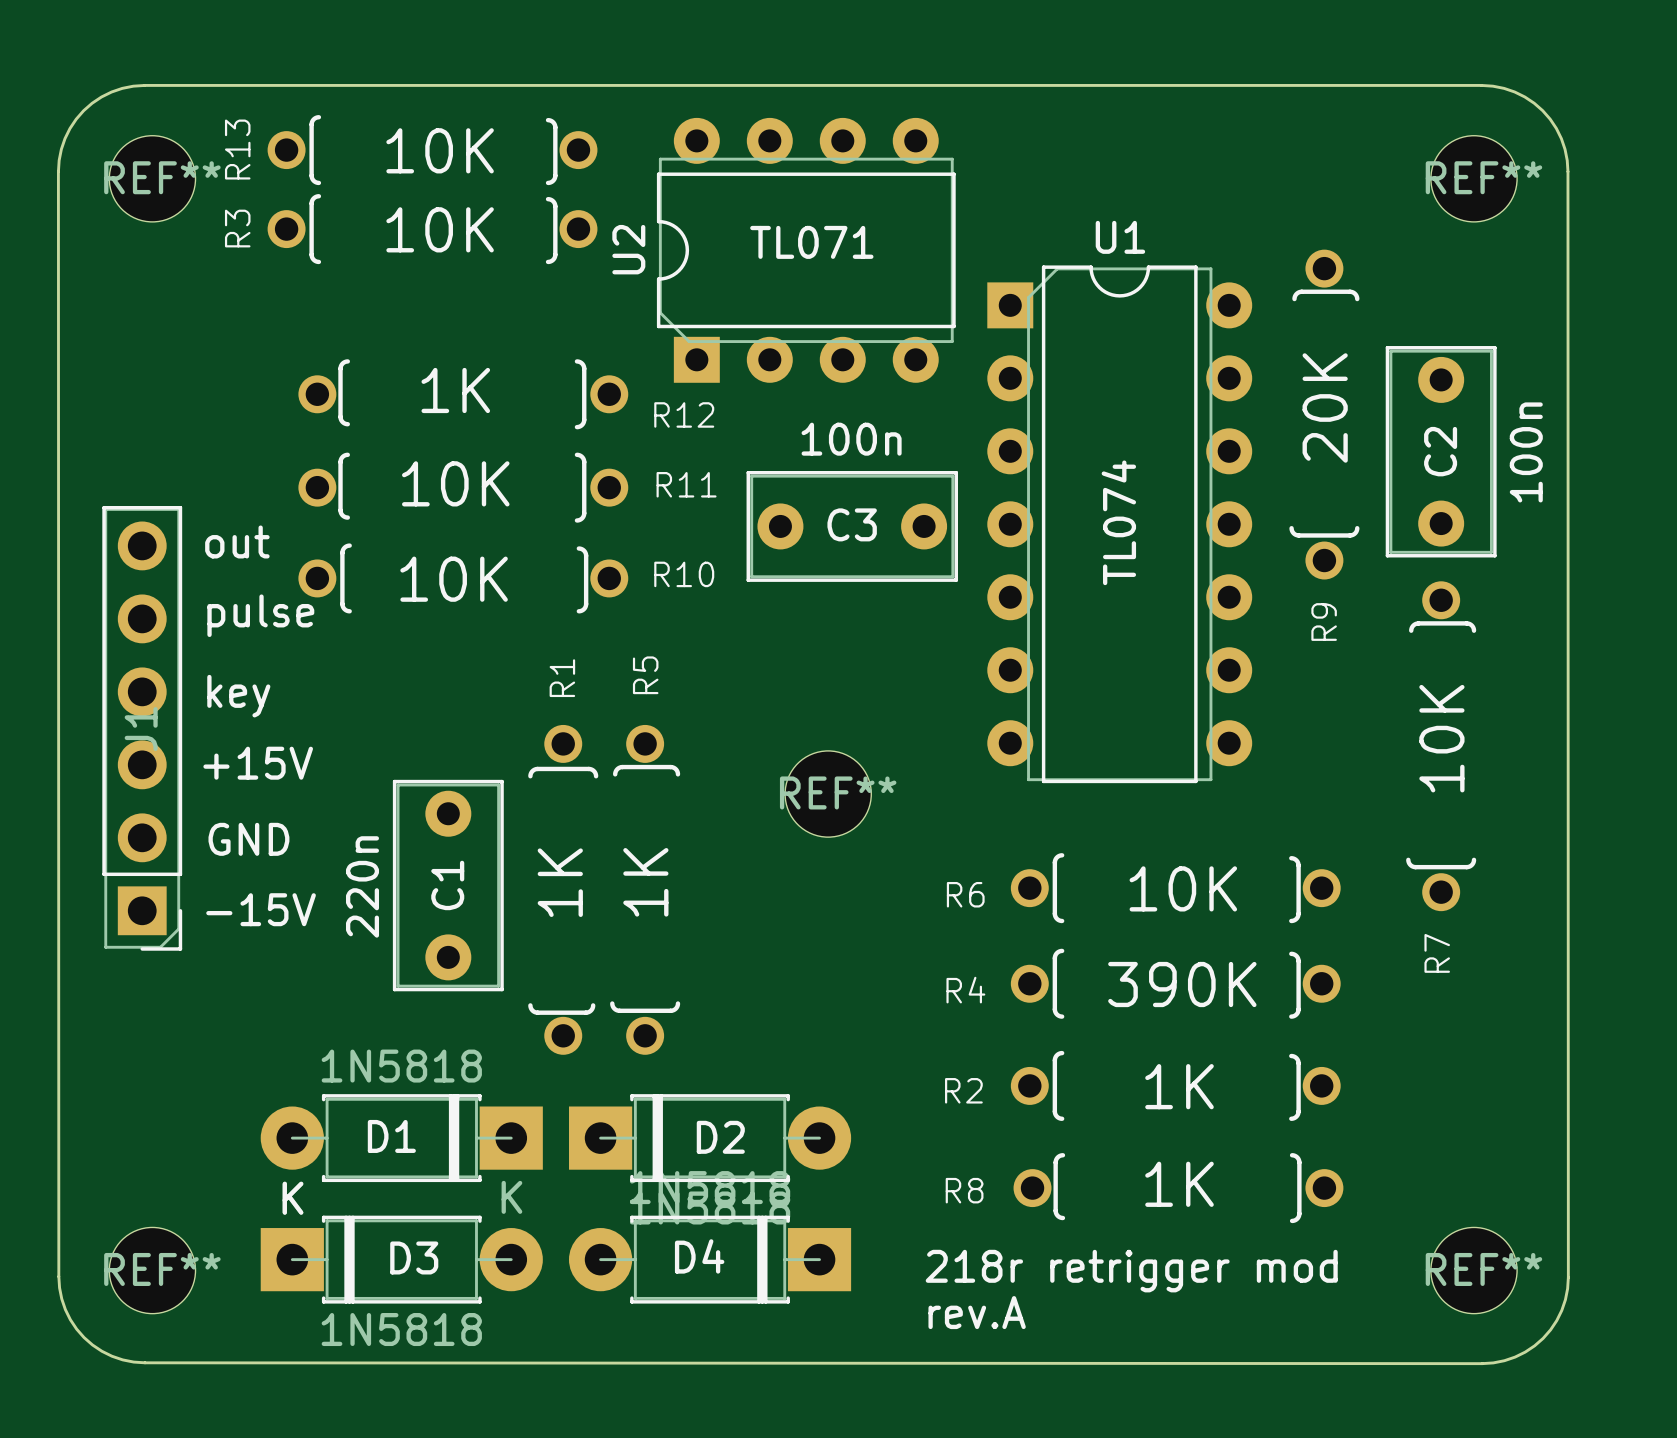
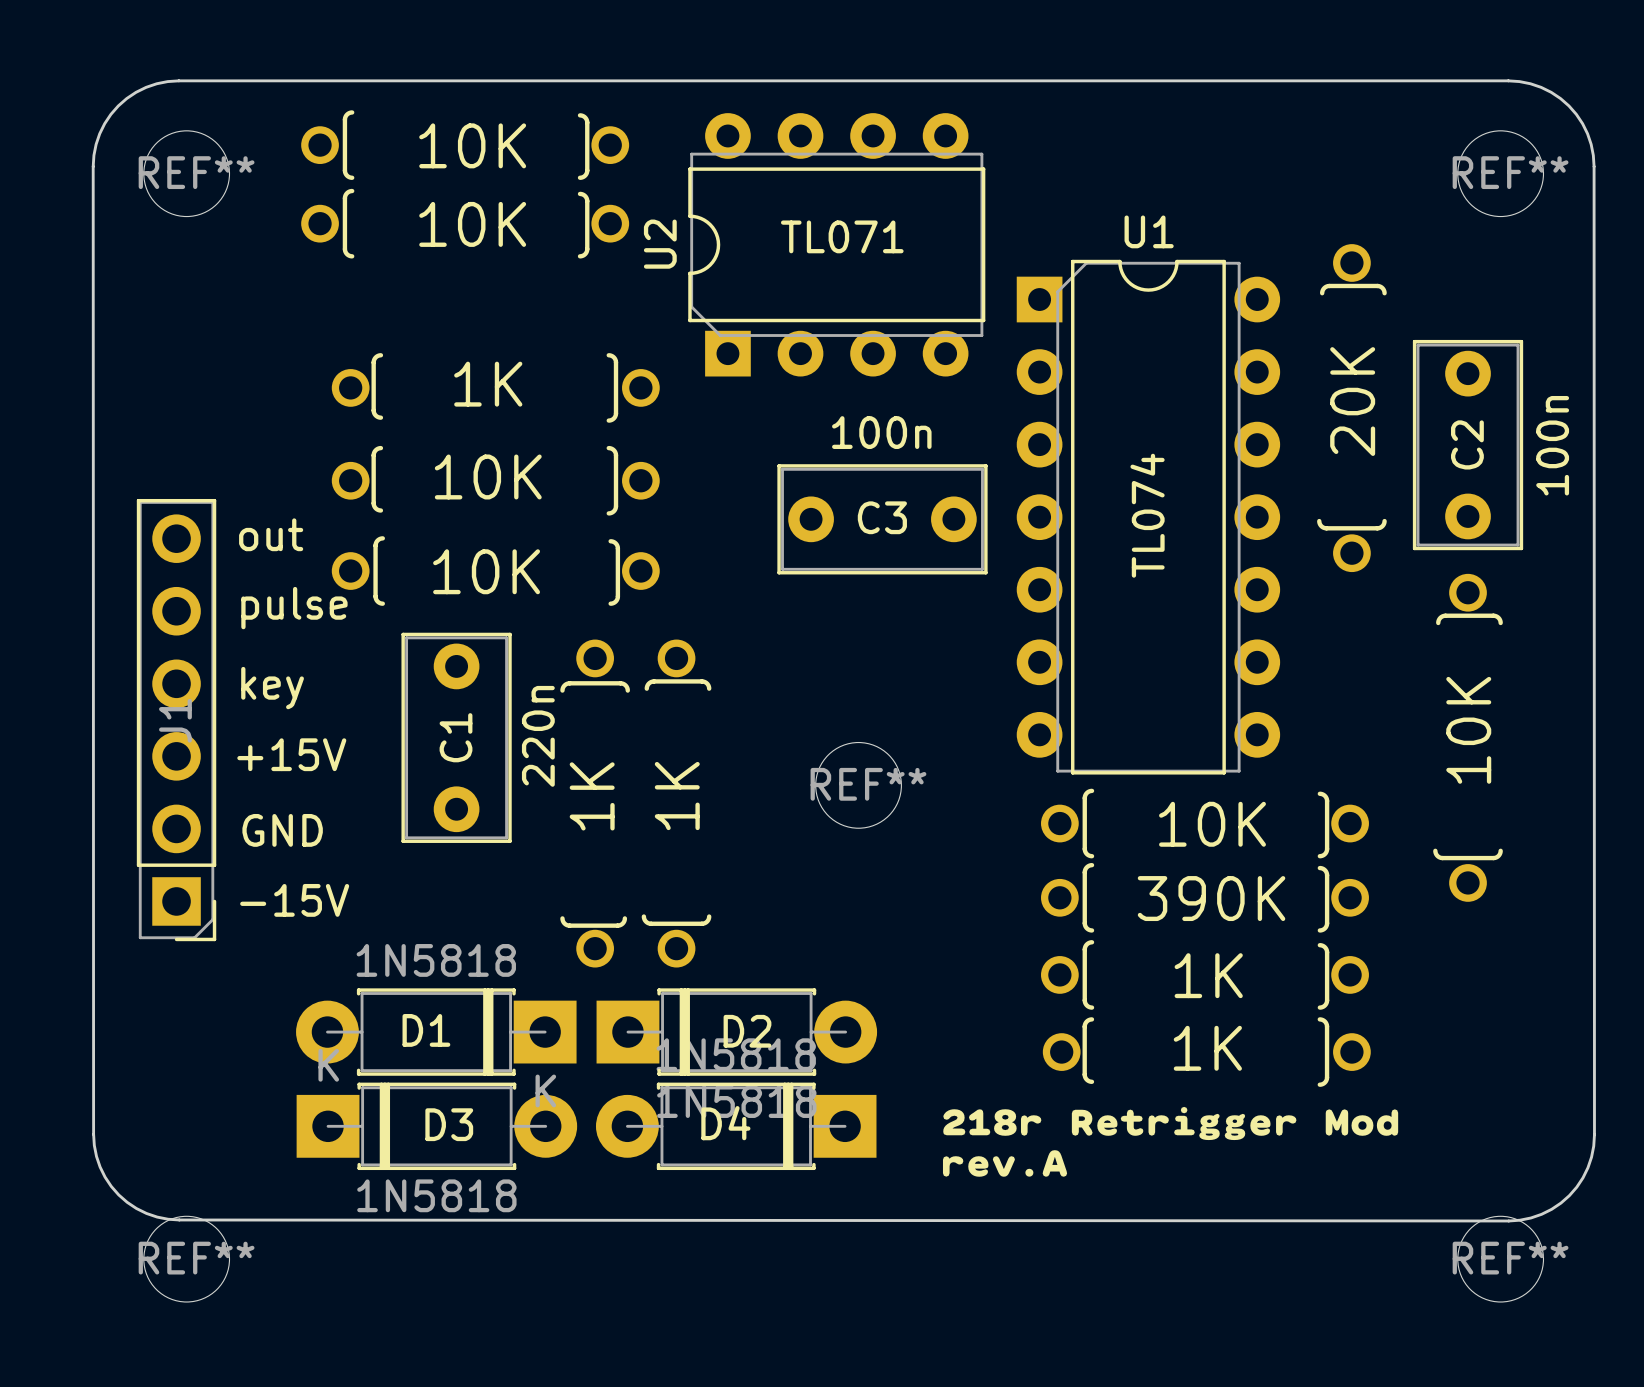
R13: 10K (432, 150) -> none
board edge: (58, 171) (58, 1276) (61, 1298) (70, 1319) (84, 1337) (101, 1351) (122, 1359) (145, 1362) (1493, 1362) (1515, 1357) (1534, 1345) (1550, 1329) (1561, 1310) (1568, 1277) (1568, 1145) -> (93, 166) (93, 1134) (96, 1156) (105, 1177) (118, 1194) (136, 1208) (157, 1217) (179, 1219) (1508, 1221) (1541, 1214) (1569, 1195) (1587, 1167) (1594, 1134)
R3: 10K (432, 229) -> none
R12: 1K (463, 394) -> none
R9: 20K (1324, 414) -> none
R11: 10K (463, 487) -> none
R10: 10K (463, 578) -> none
R7: 10K (1441, 746) -> none
part: none -> 1K (595, 803)
part: none -> 1K (676, 803)
part: none -> 10K (1204, 823)
C1 position: (448, 885) -> (456, 737)
C1 value position: 220n (362, 886) -> 220n (538, 736)
R6: 10K (1175, 888) -> none
R1: 1K (563, 889) -> none
R5: 1K (645, 889) -> none
part: none -> 390K (1204, 897)
R4: 390K (1175, 983) -> none
part: none -> 1K (1204, 974)
part: none -> 1K (1206, 1052)
R2: 1K (1175, 1085) -> none
drawing: none -> [942, 1106, 1399, 1177]
D1 position: (401, 1138) -> (436, 1032)
D2 position: (710, 1138) -> (736, 1032)
R8: 1K (1178, 1188) -> none
D3 position: (401, 1259) -> (436, 1126)
D4 position: (710, 1259) -> (736, 1126)
text: 218r retrigger mod (1131, 1271) -> none
text: rev.A (977, 1312) -> none

